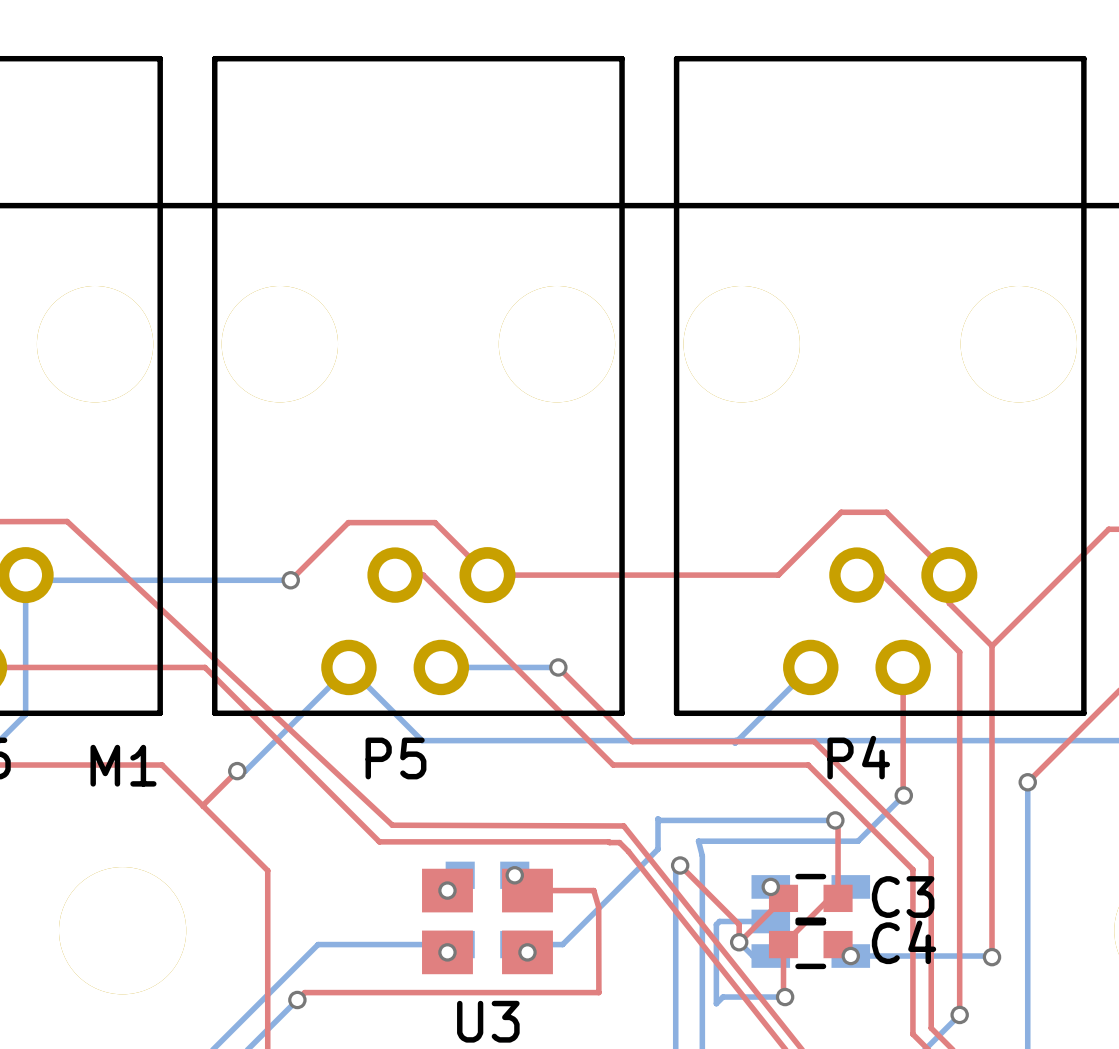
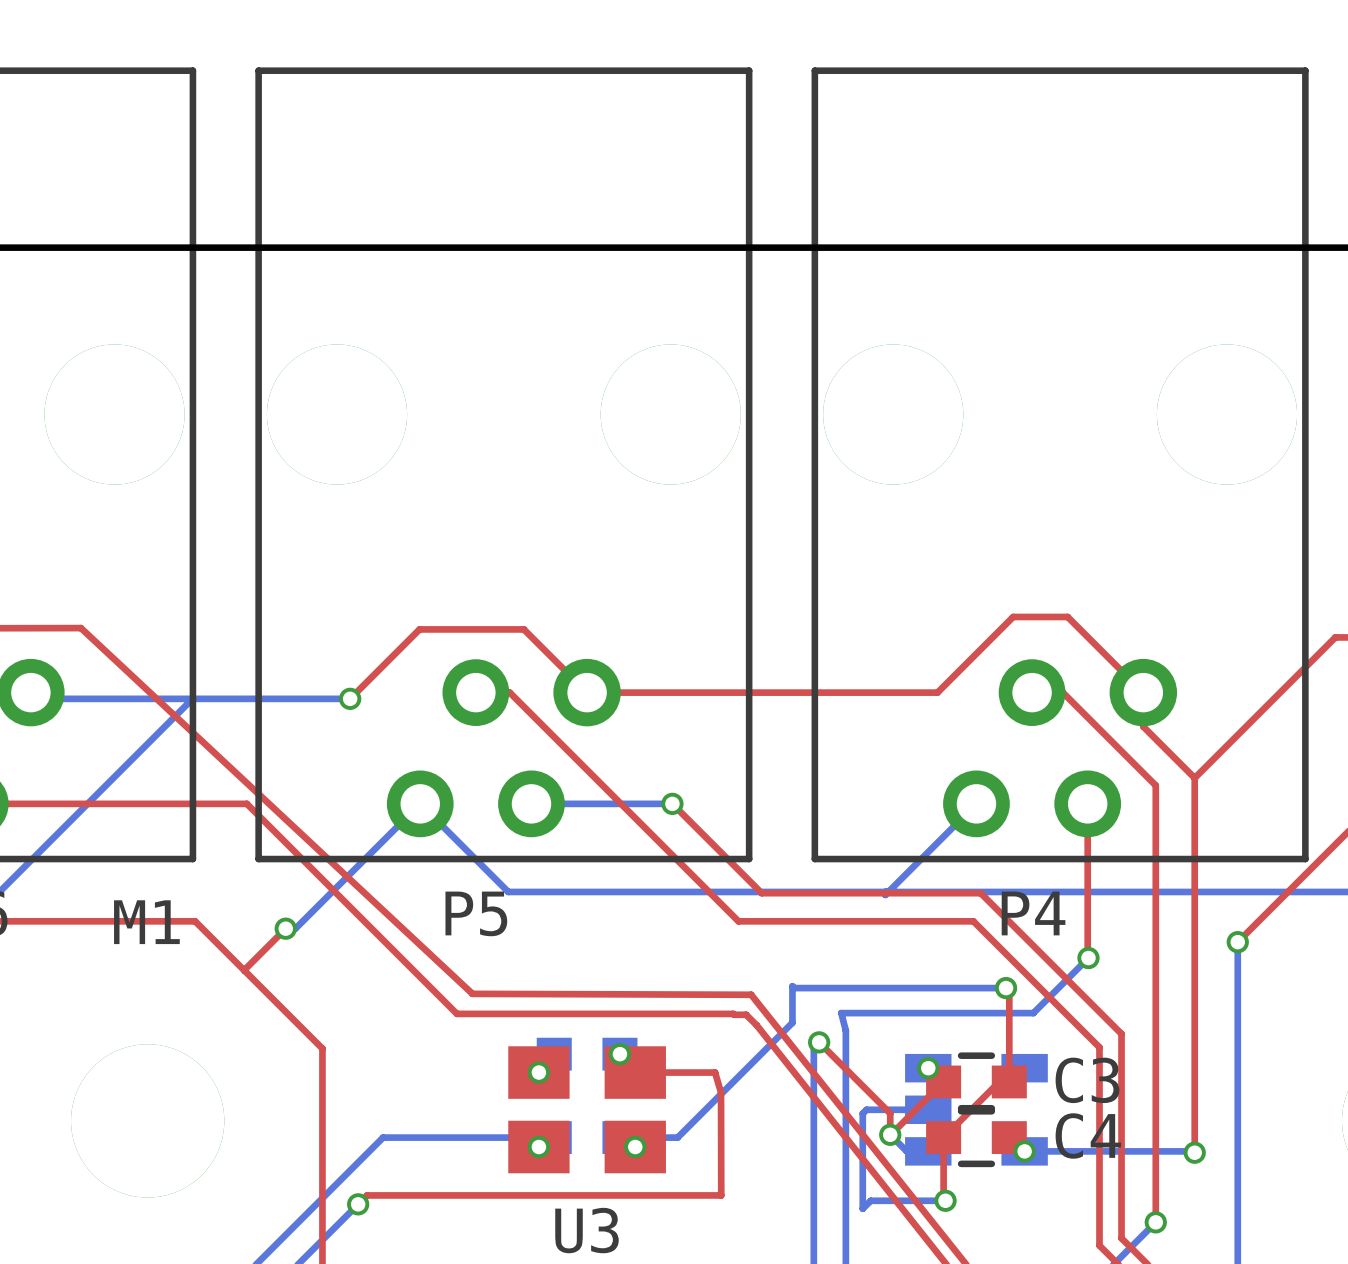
bottom track: (25, 575) (25, 714) -> (192, 698) (30, 860)

